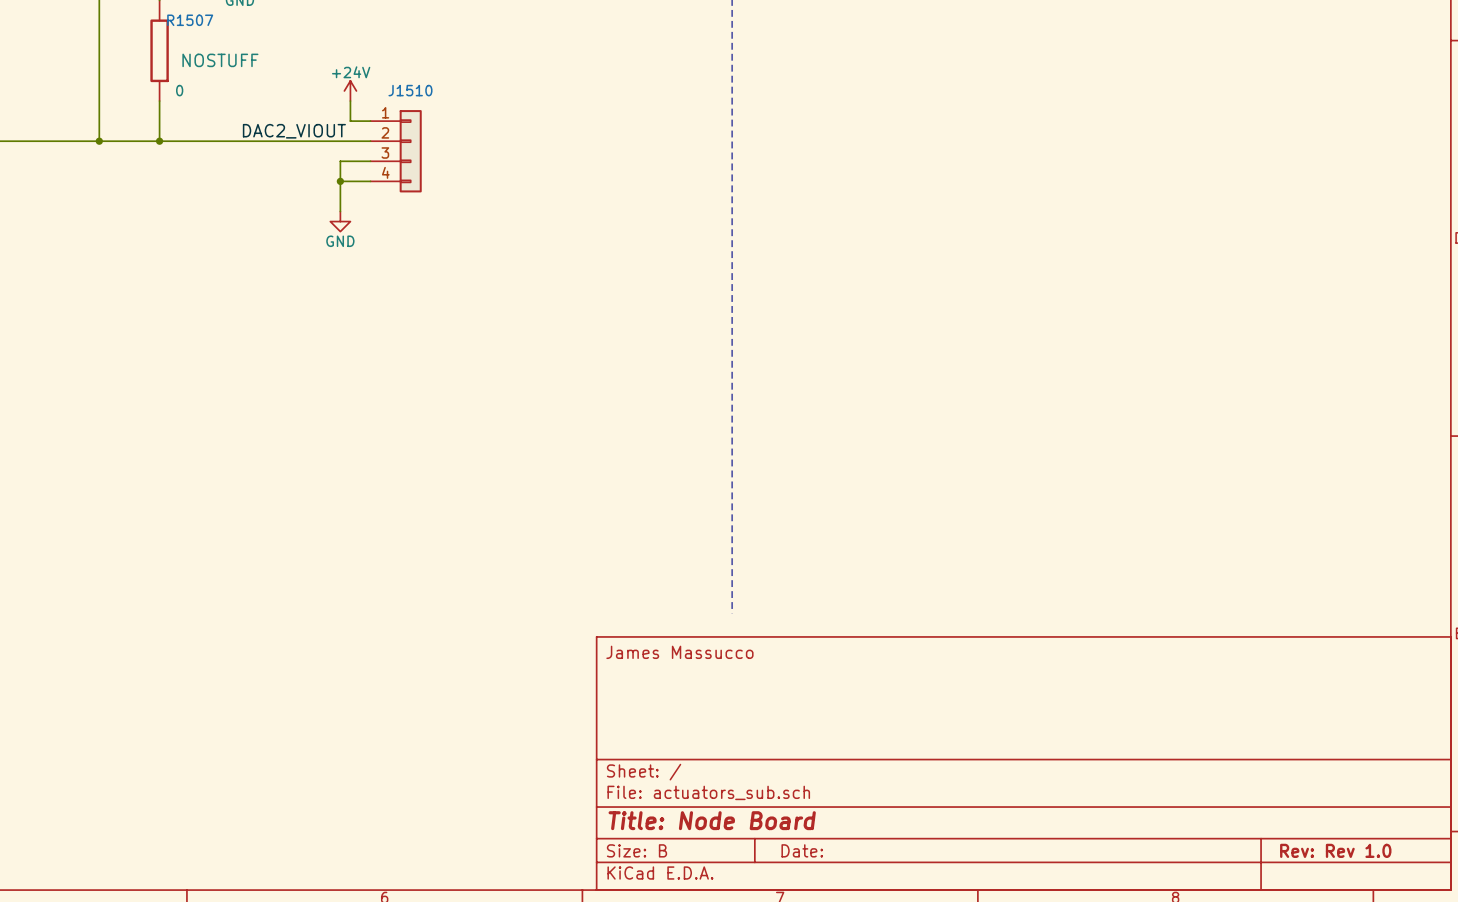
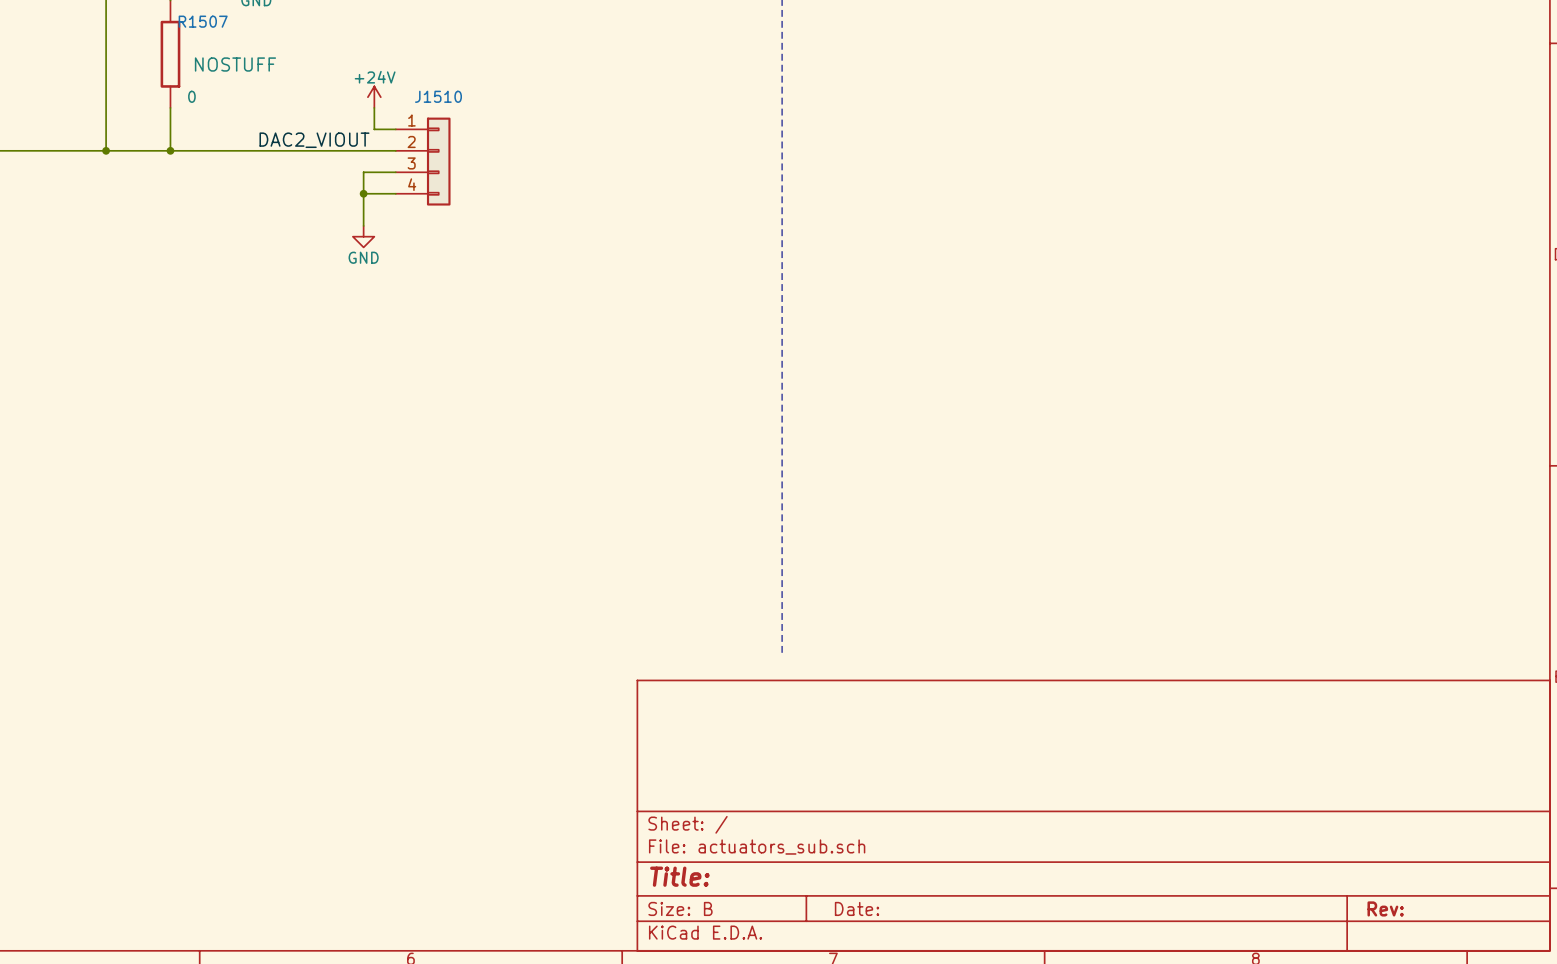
title block: James Massucco (679, 652) -> none
title block: Title: Node Board (712, 820) -> Title: (679, 876)
title block: Rev: Rev 1.0 (1335, 850) -> Rev: (1385, 908)

